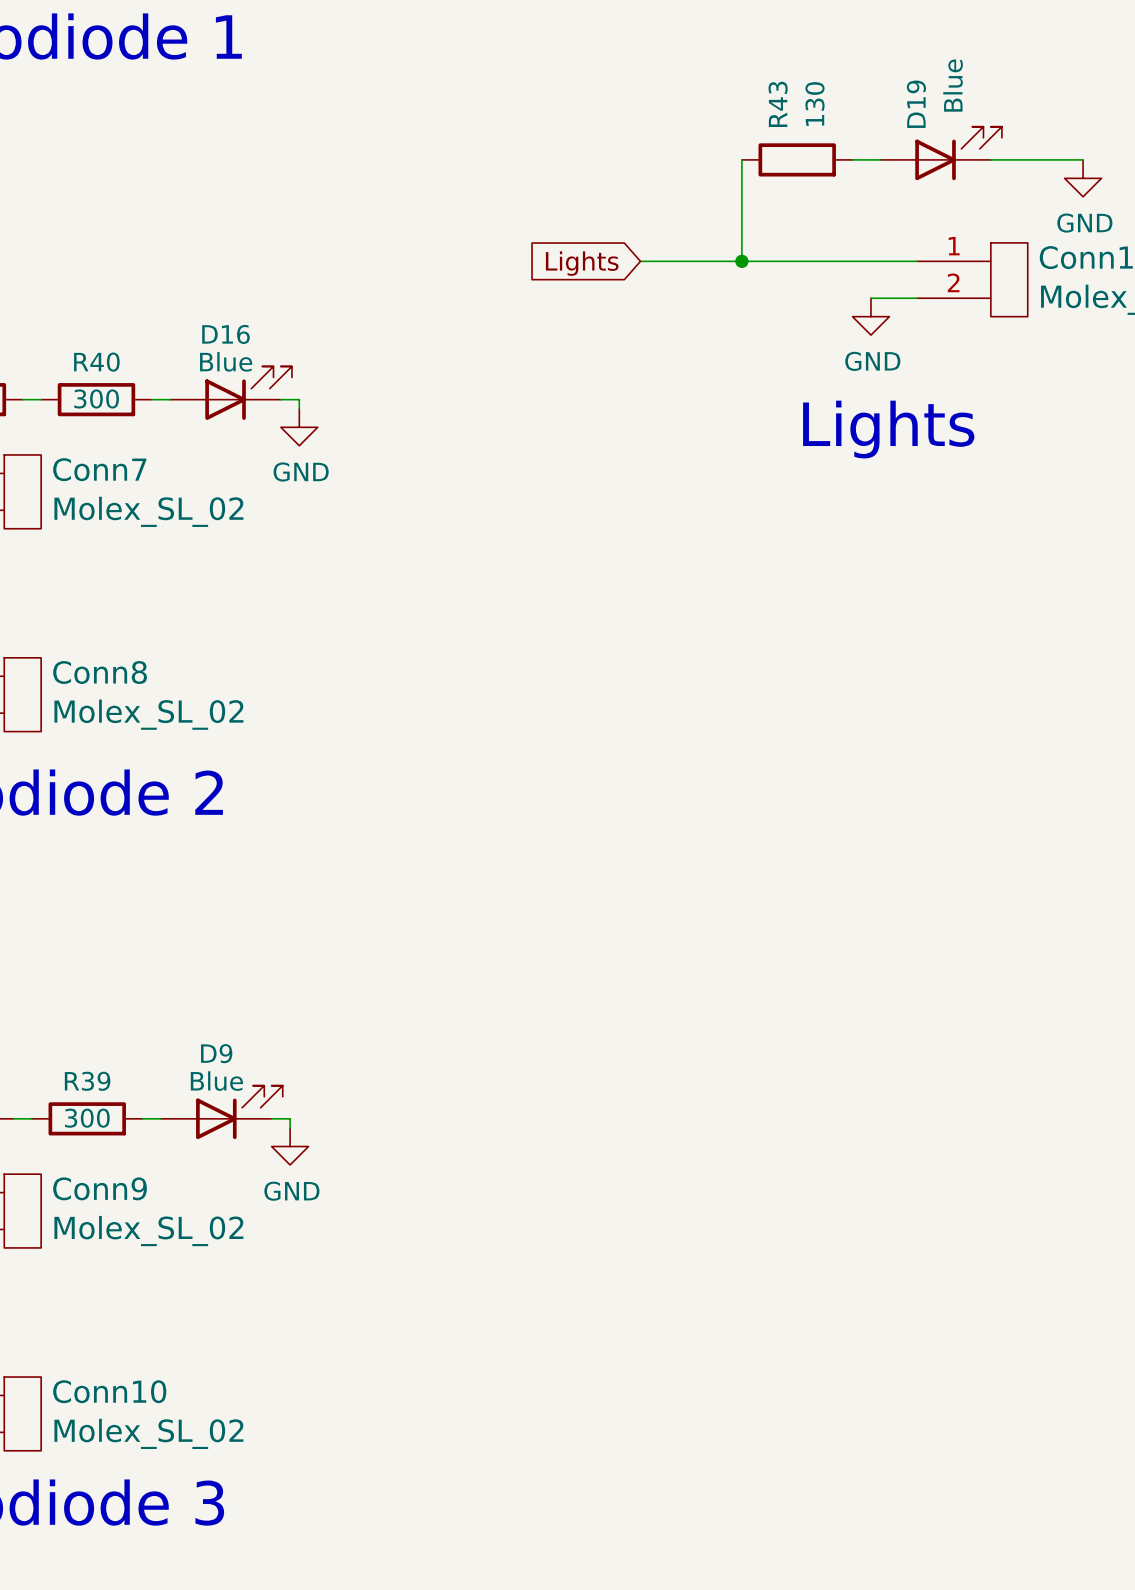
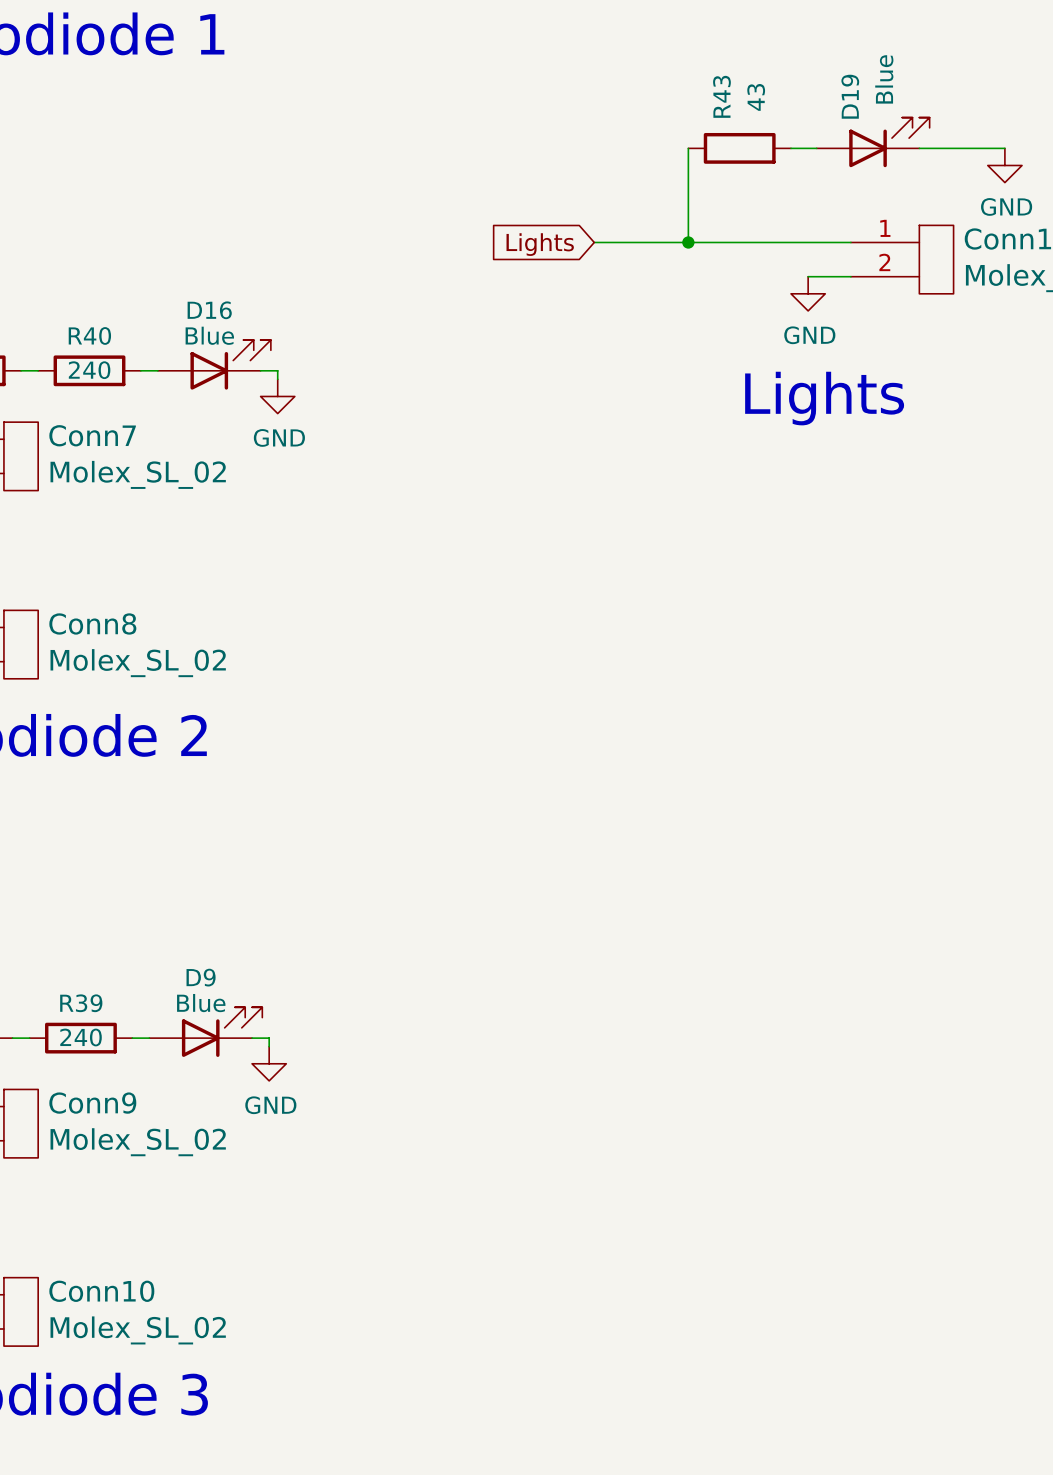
R43 value: 130 (814, 104) -> 43 (756, 97)
R40 value: 300 (96, 398) -> 240 (89, 370)
R39 value: 300 (87, 1118) -> 240 (81, 1037)

